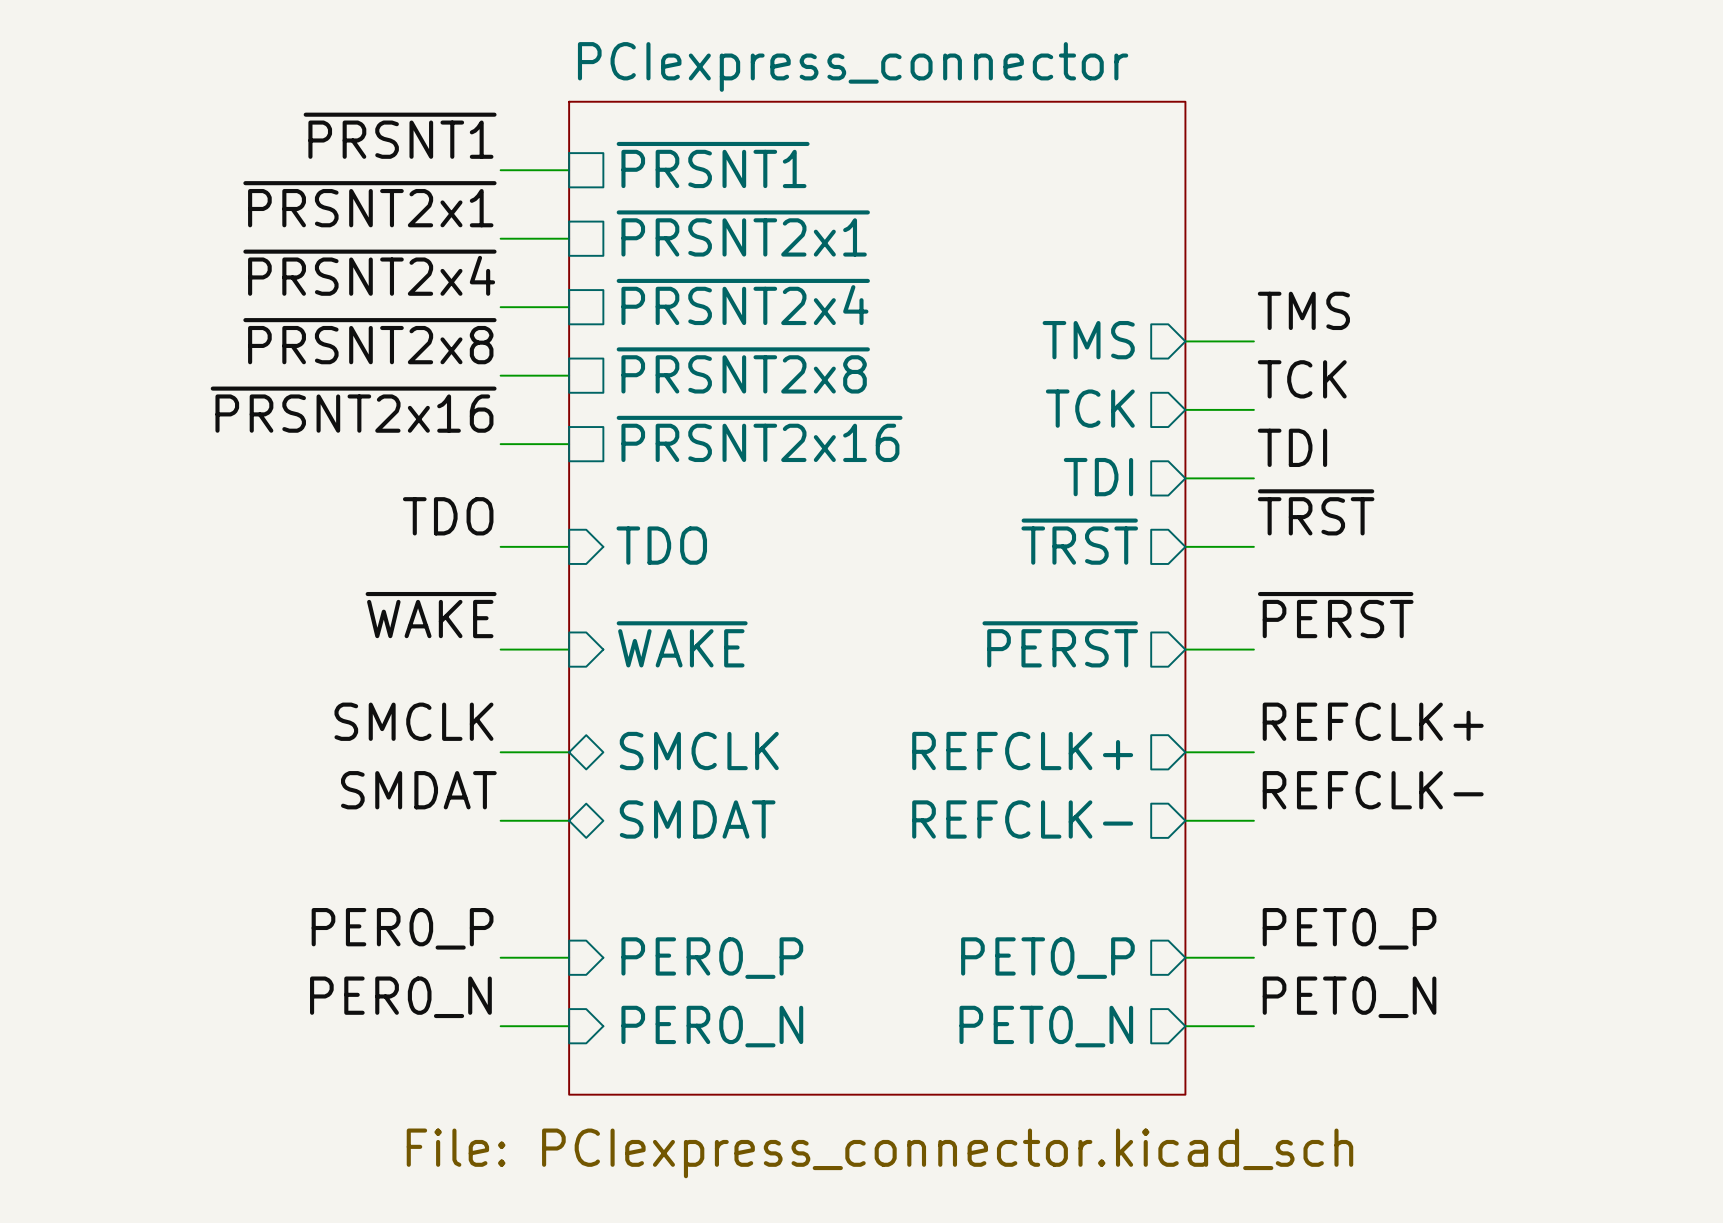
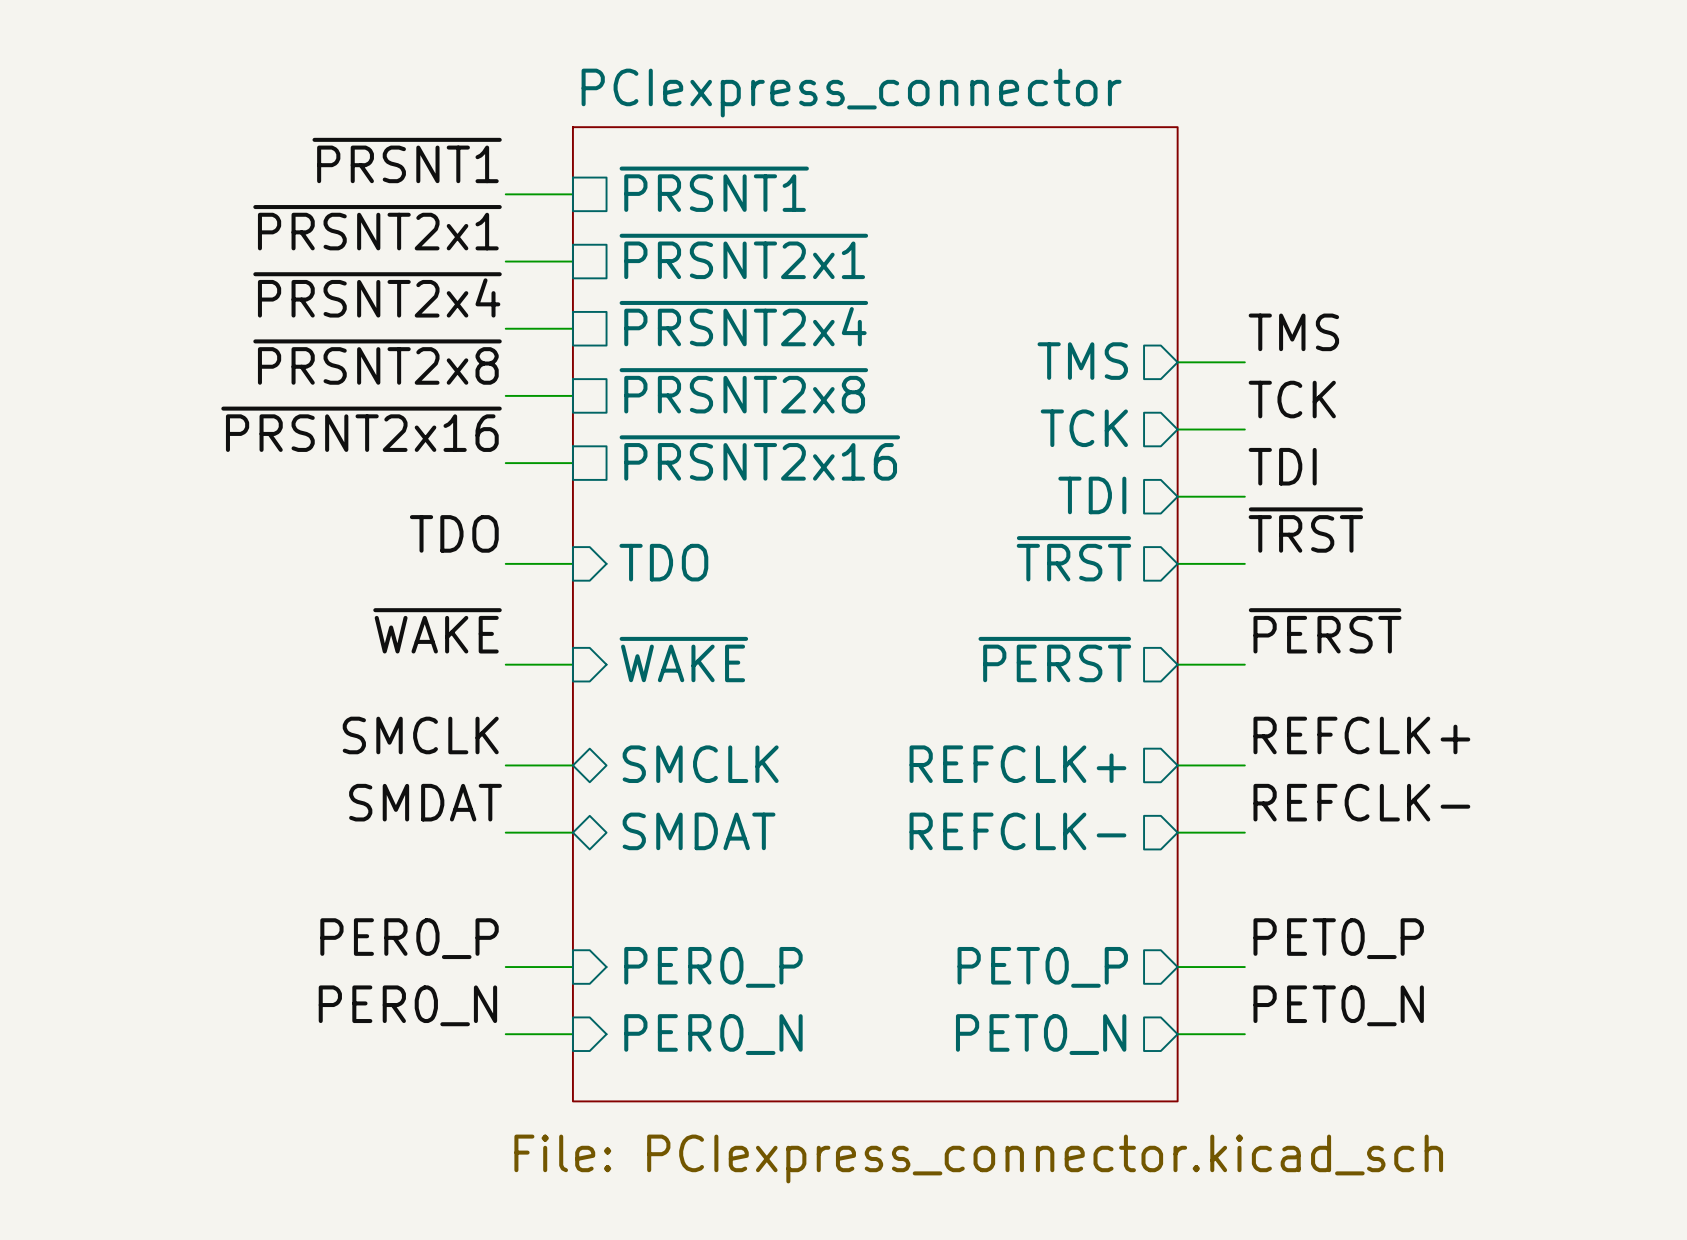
sheet PCIexpress_connector value position: File: PCIexpress_connector.kicad_sch (879, 1153) -> File: PCIexpress_connector.kicad_sch (978, 1158)

